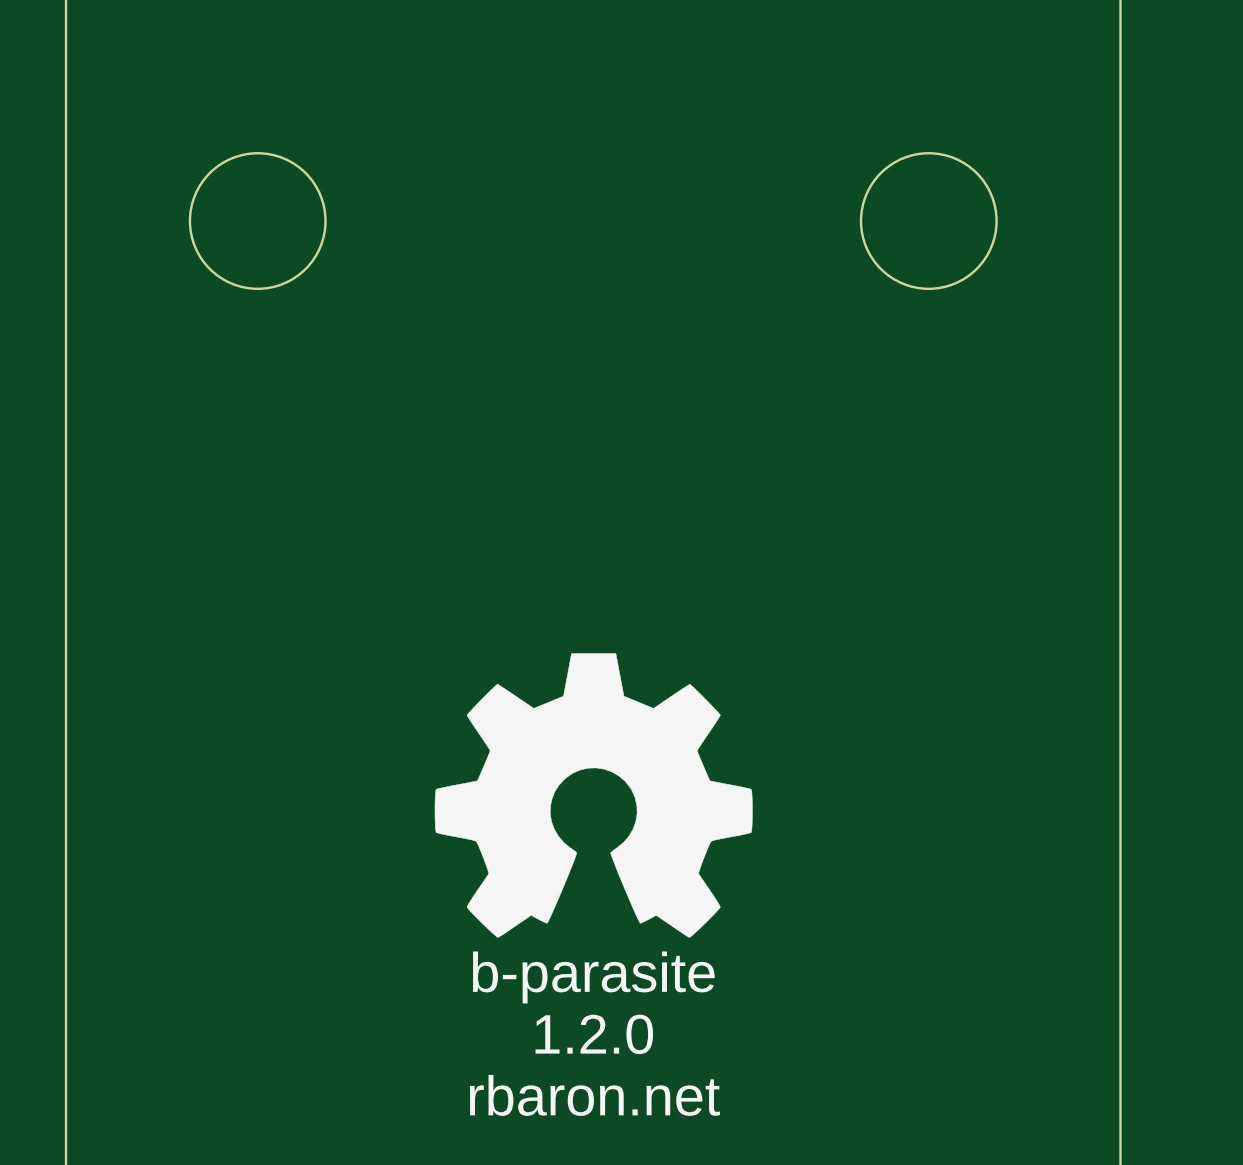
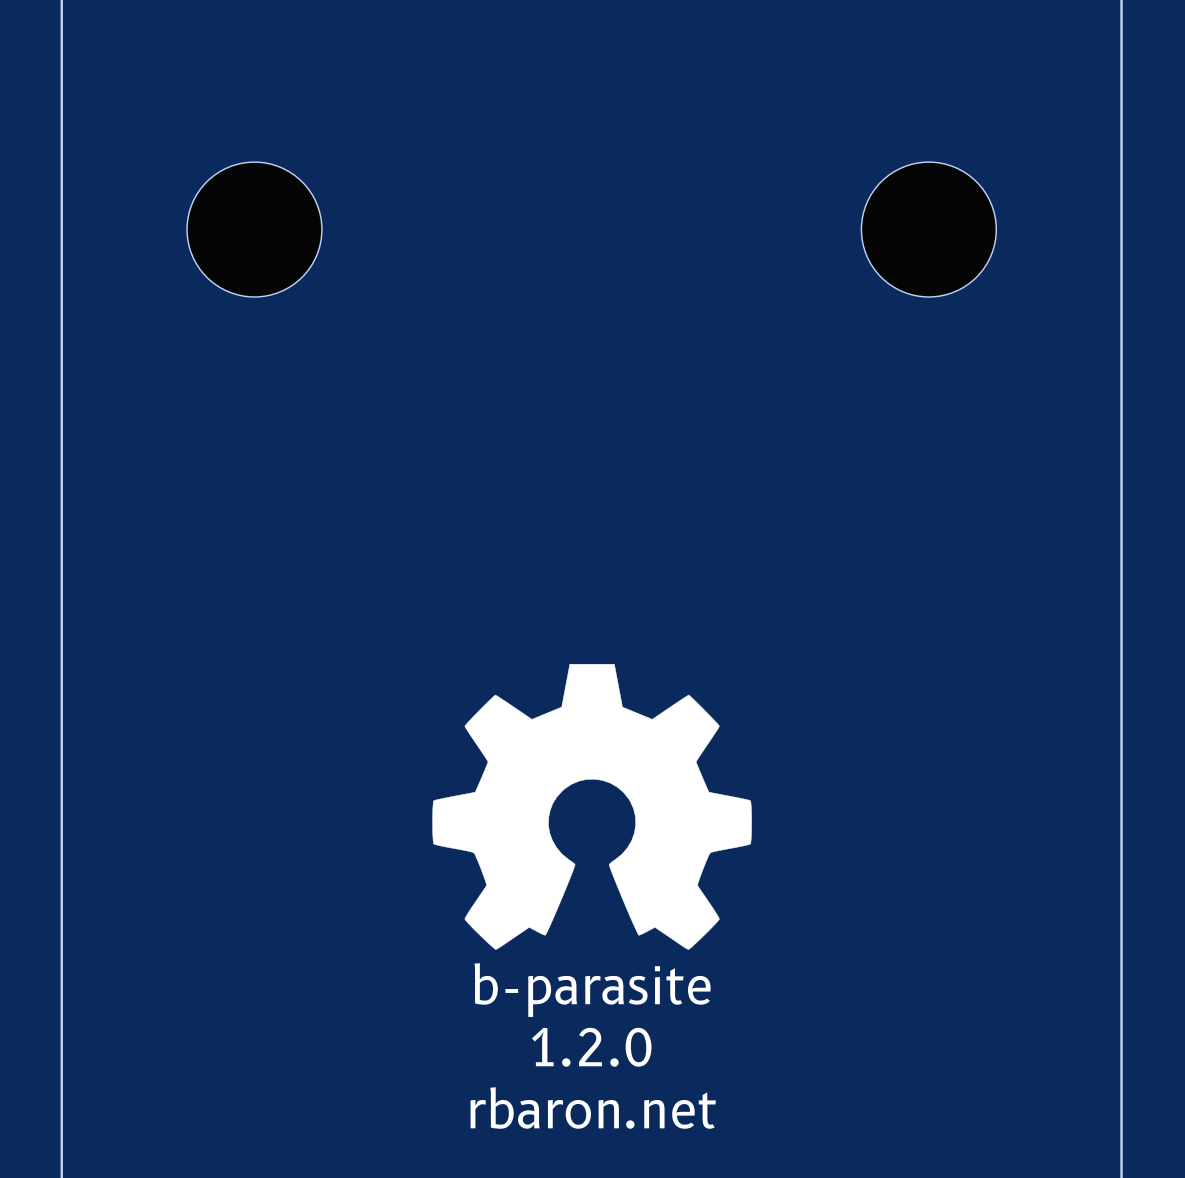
round board edge: [188, 152, 327, 291] -> none
round board edge: [859, 152, 998, 291] -> none
part: none -> (254, 229)
part: none -> (928, 229)

